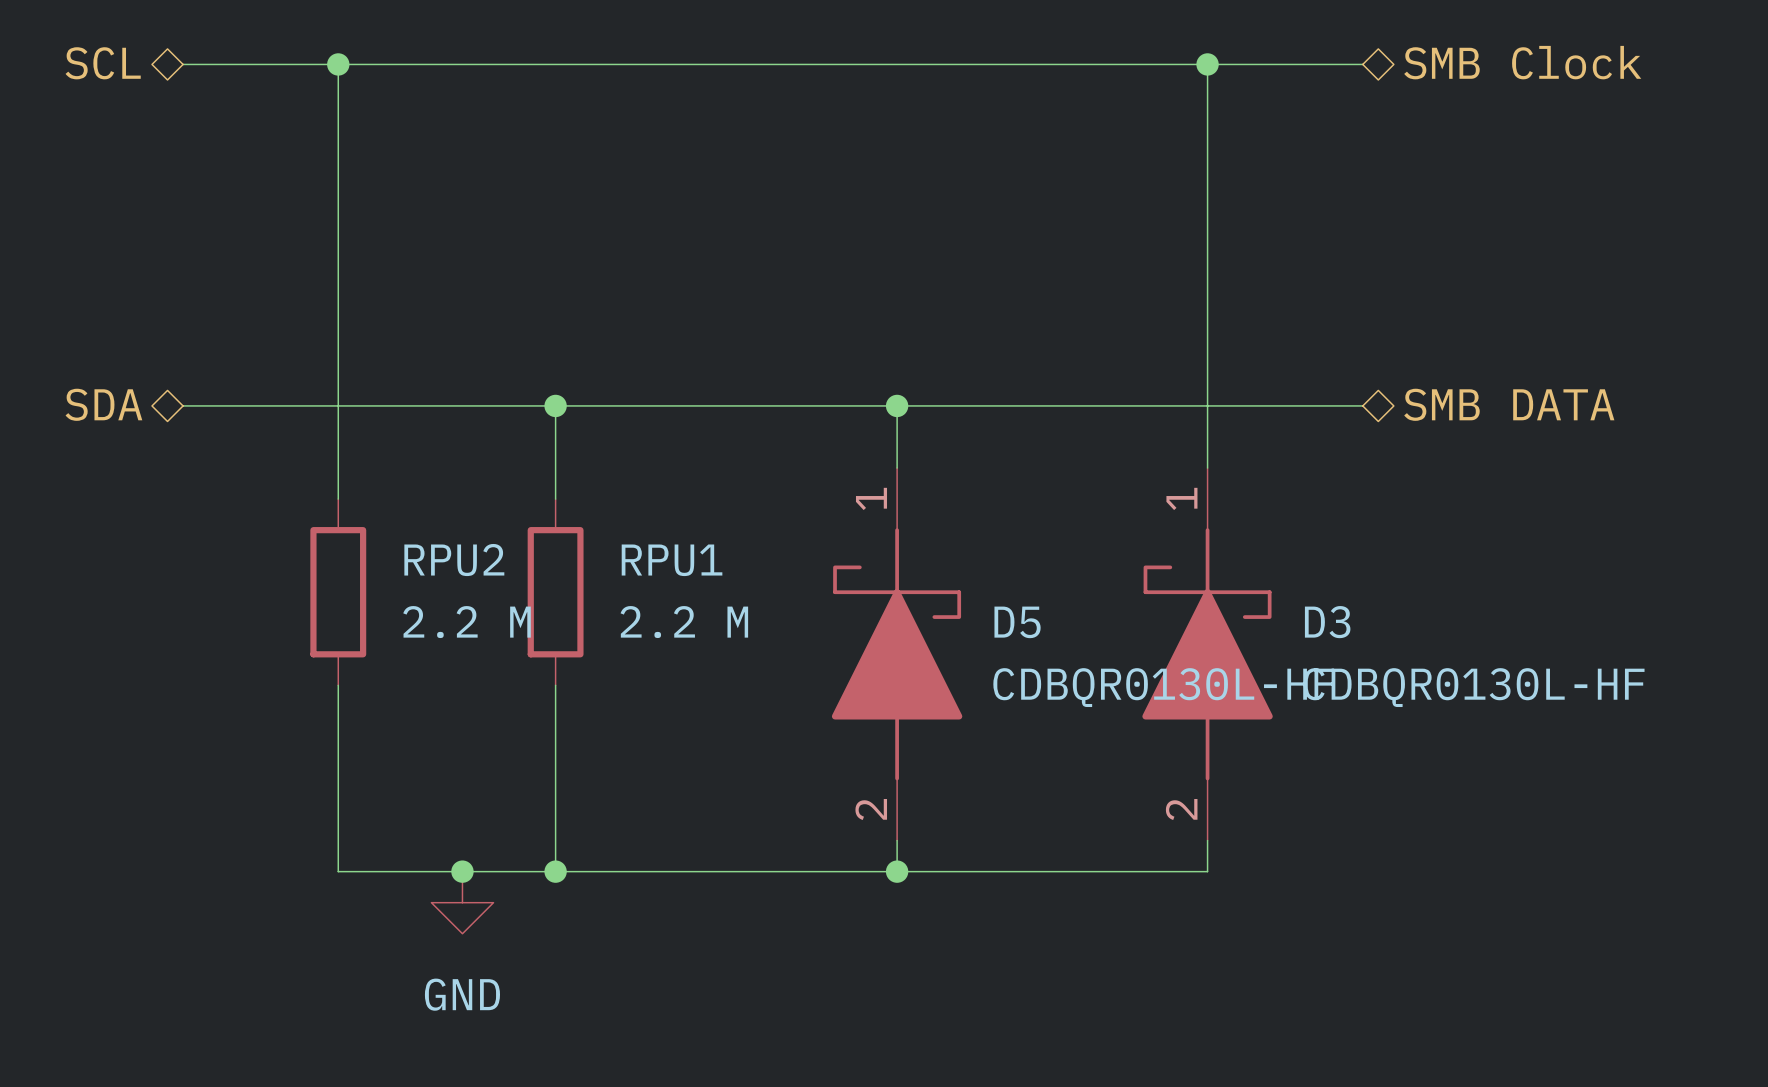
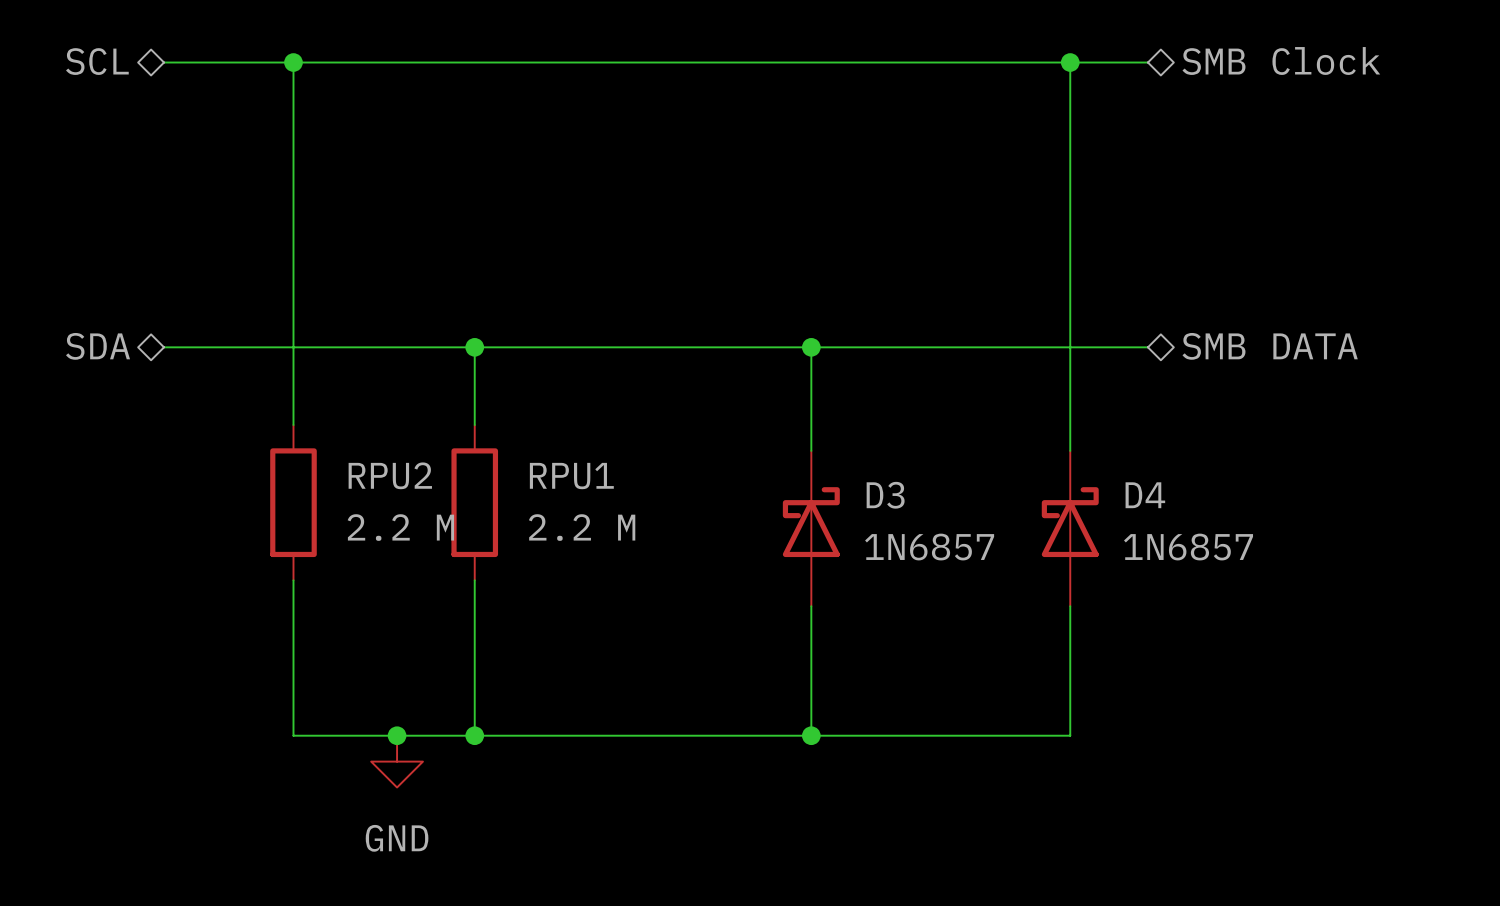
wire: (1207, 64) (1207, 468) -> none
junction position: (1207, 64) -> (1070, 62)
wire: none -> (1070, 62) (1070, 450)
wire: (897, 405) (897, 468) -> none
junction position: (897, 405) -> (811, 347)
wire: none -> (811, 347) (811, 450)
D3 symbol: [1142, 468, 1273, 841] -> [782, 450, 840, 607]
D4: none -> 1N6857 (1070, 528)
D5: CDBQR0130L-HF (897, 654) -> none
D3 value: CDBQR0130L-HF (1474, 687) -> 1N6857 (929, 547)
wire: none -> (811, 606) (811, 735)
wire: (897, 840) (897, 871) -> none
wire: (1207, 840) (1207, 871) -> (1070, 606) (1070, 735) (1018, 735)
junction position: (897, 871) -> (811, 735)

